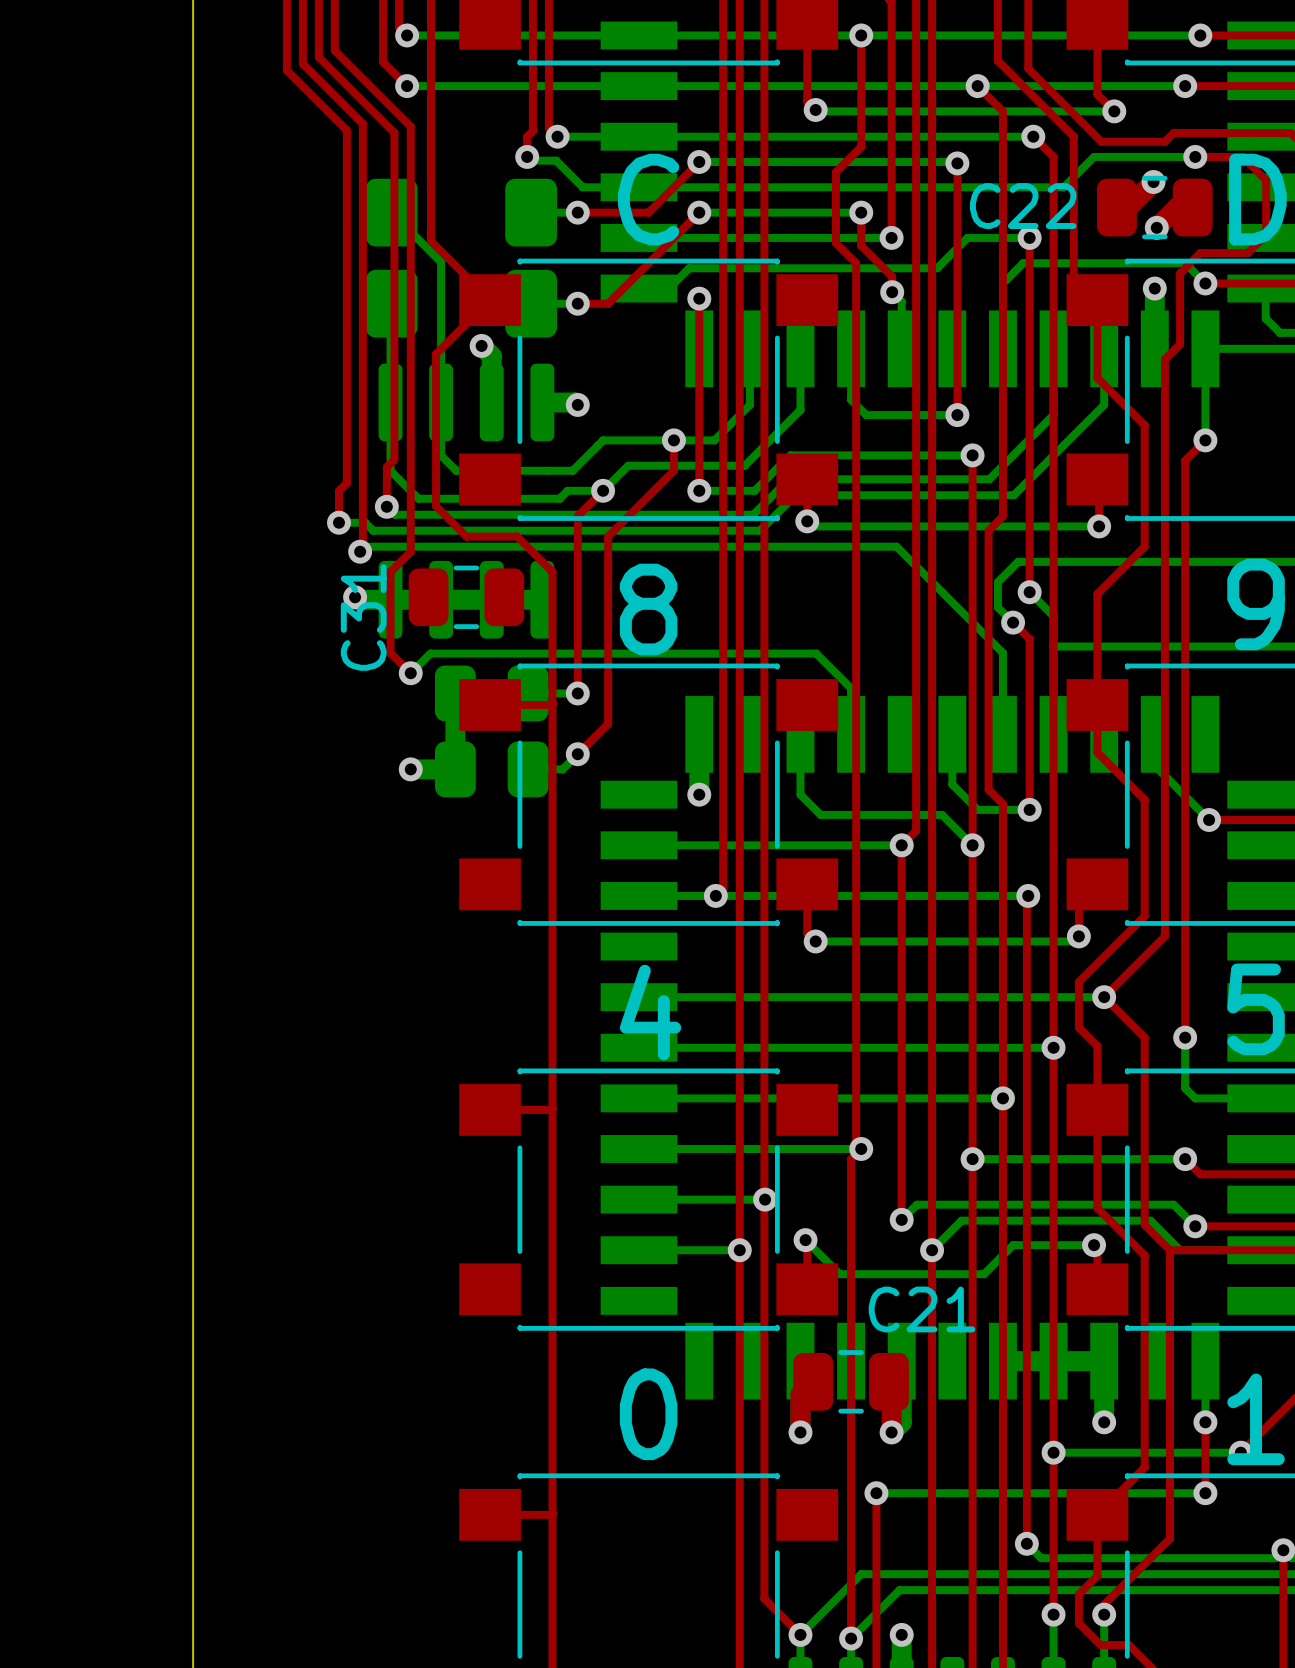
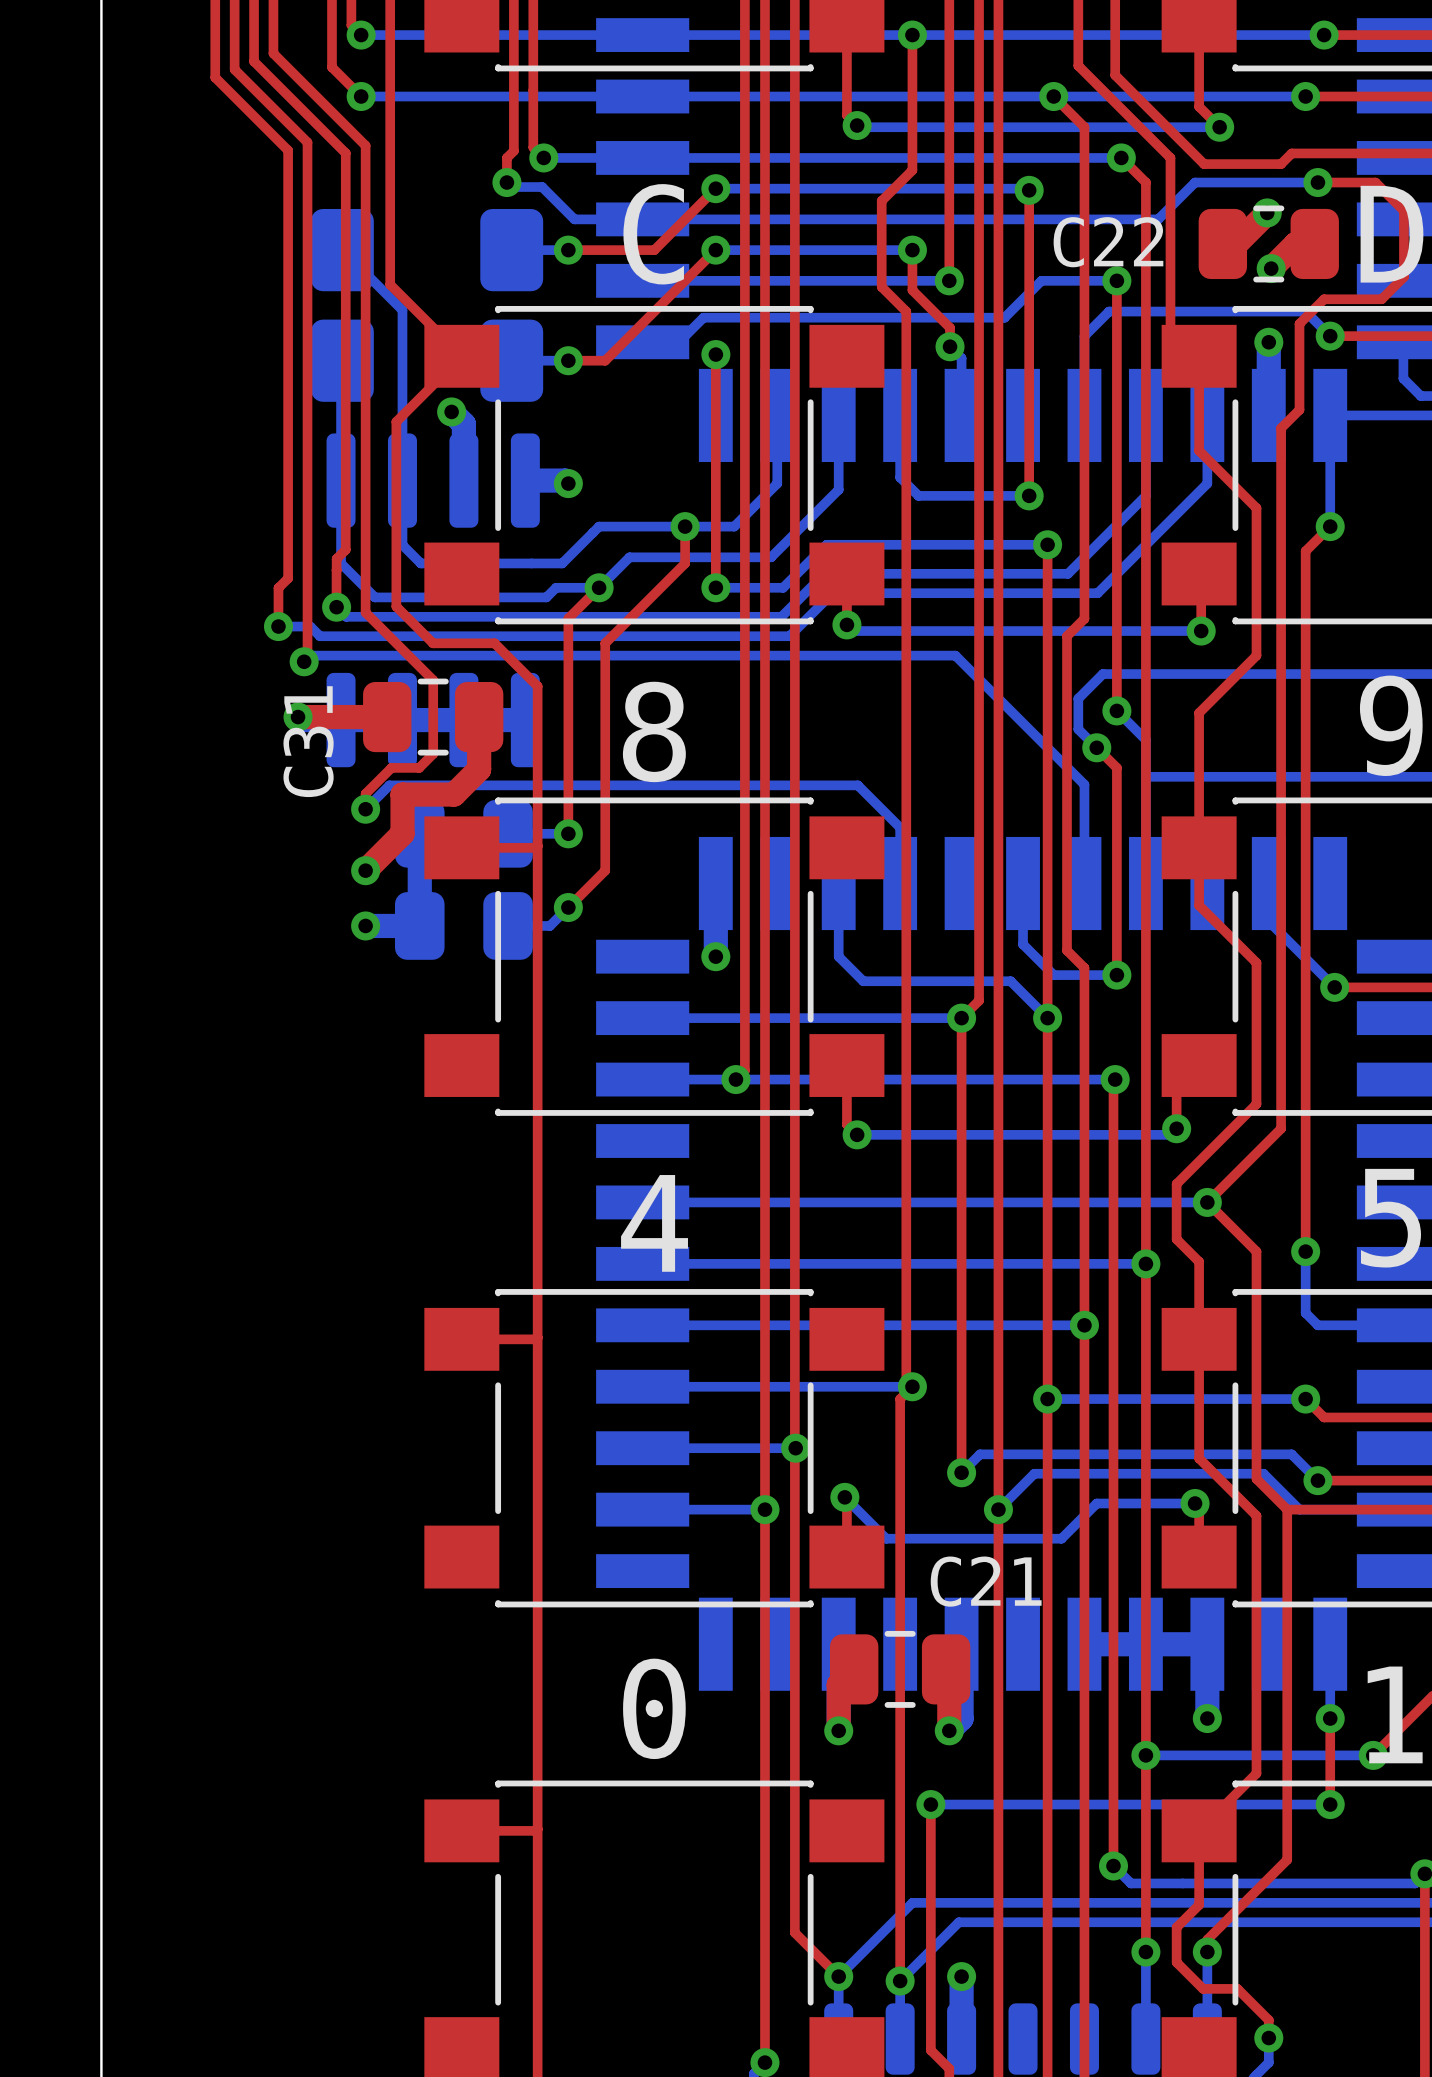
top track: (410, 511) (410, 551) (390, 571) (390, 652) (410, 673) -> (365, 612) (433, 680) (433, 753) (419, 767) (391, 767) (365, 793) (365, 809)
top track: none -> (298, 717) (387, 717)
top track: none -> (479, 717) (479, 769) (454, 794) (402, 794) (402, 833) (365, 870)
via: none -> (365, 870)

